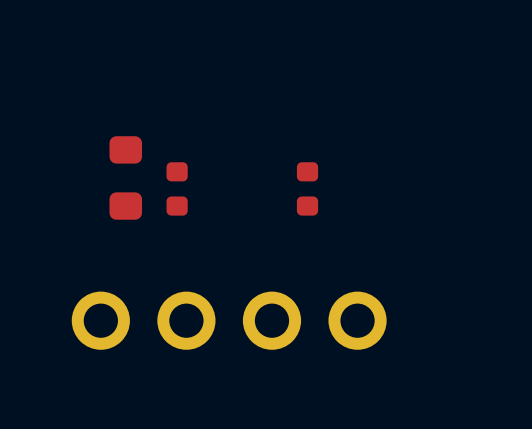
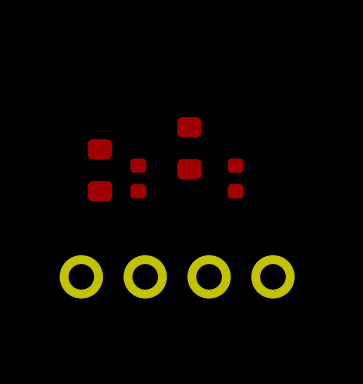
part: none -> (189, 148)

